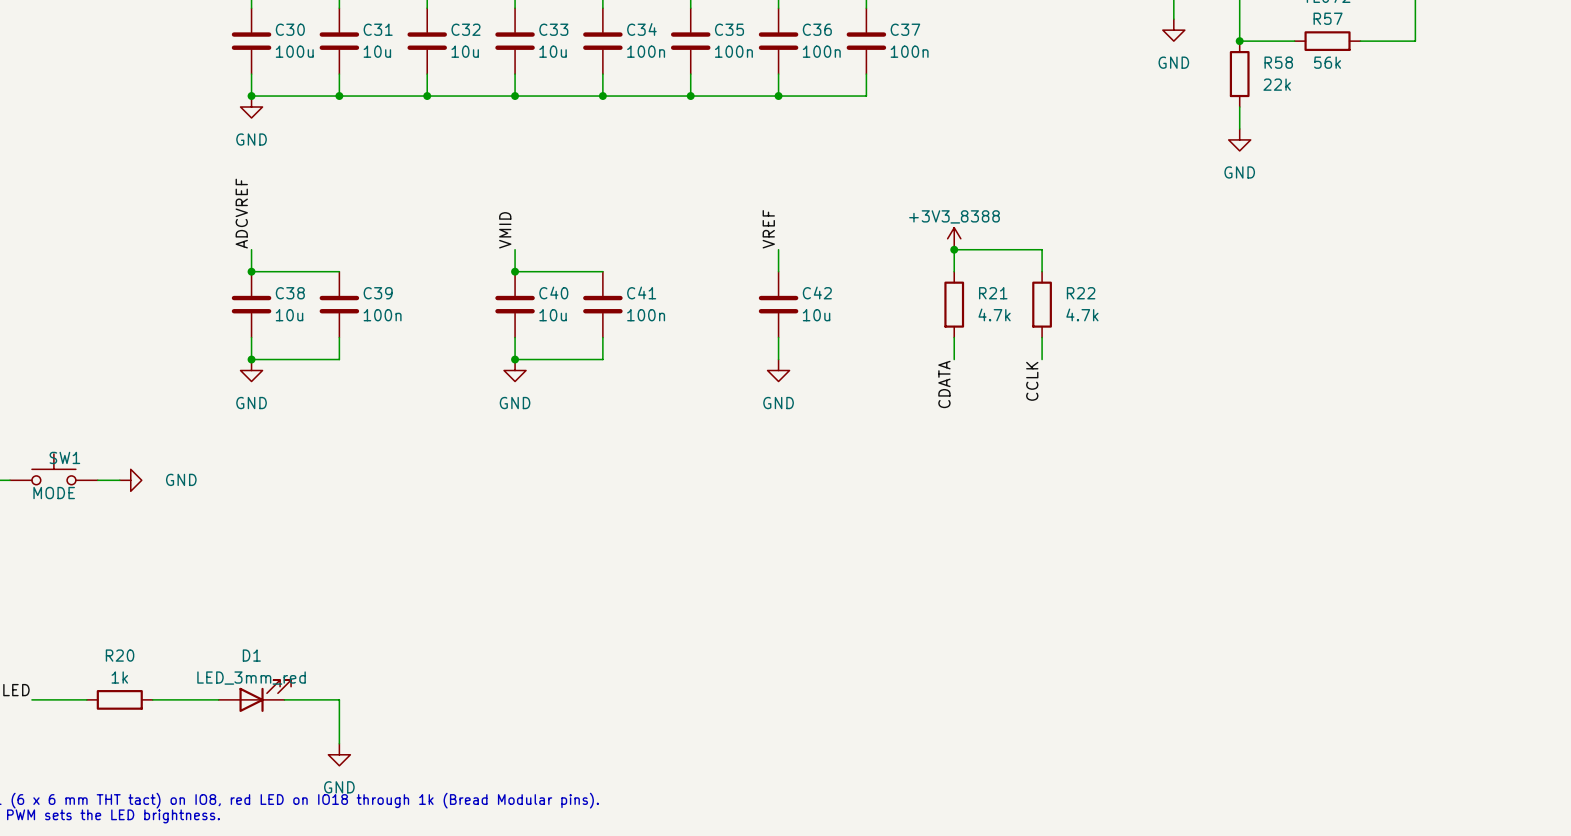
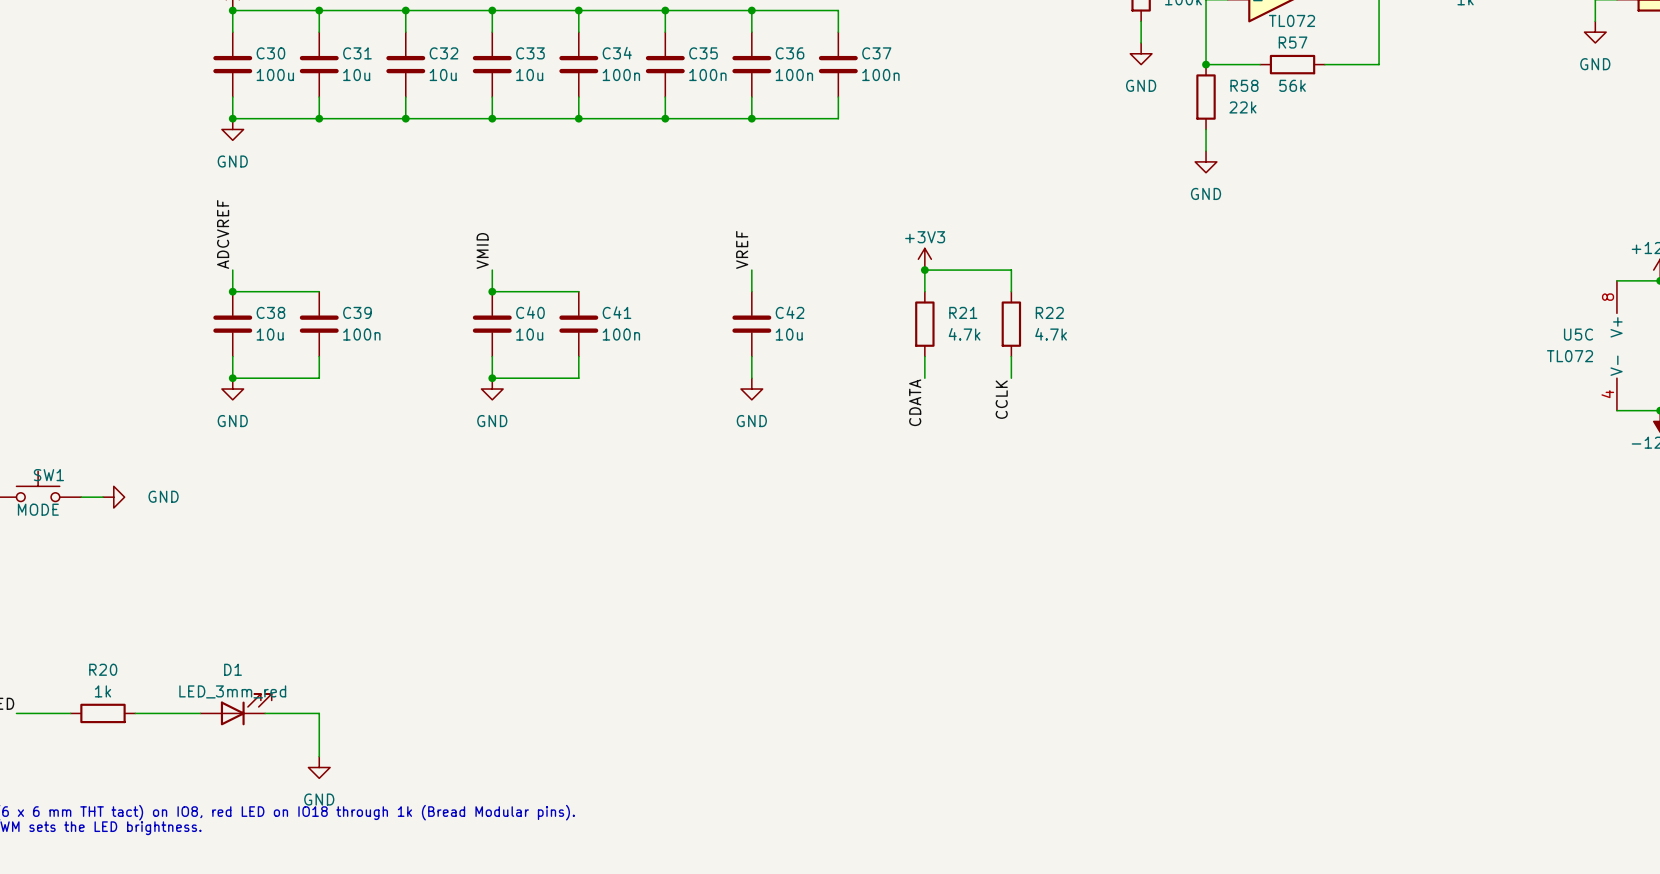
power symbol: +3V3_8388 (954, 238) -> +3V3 (924, 259)

